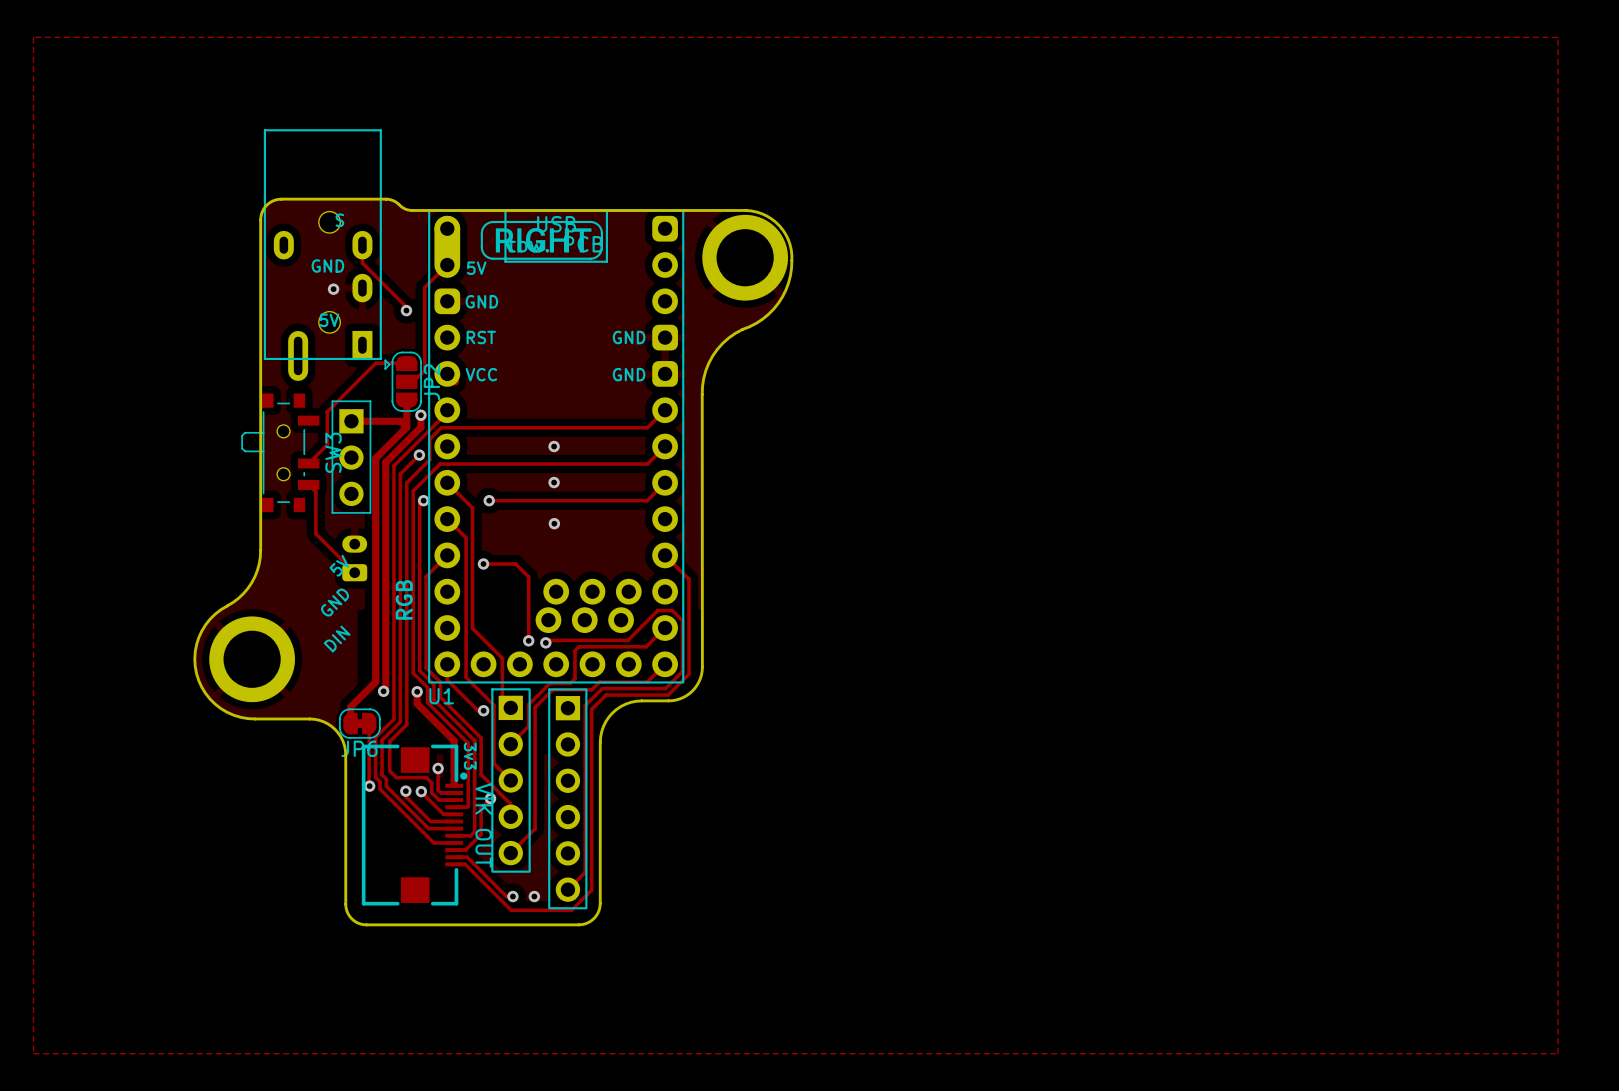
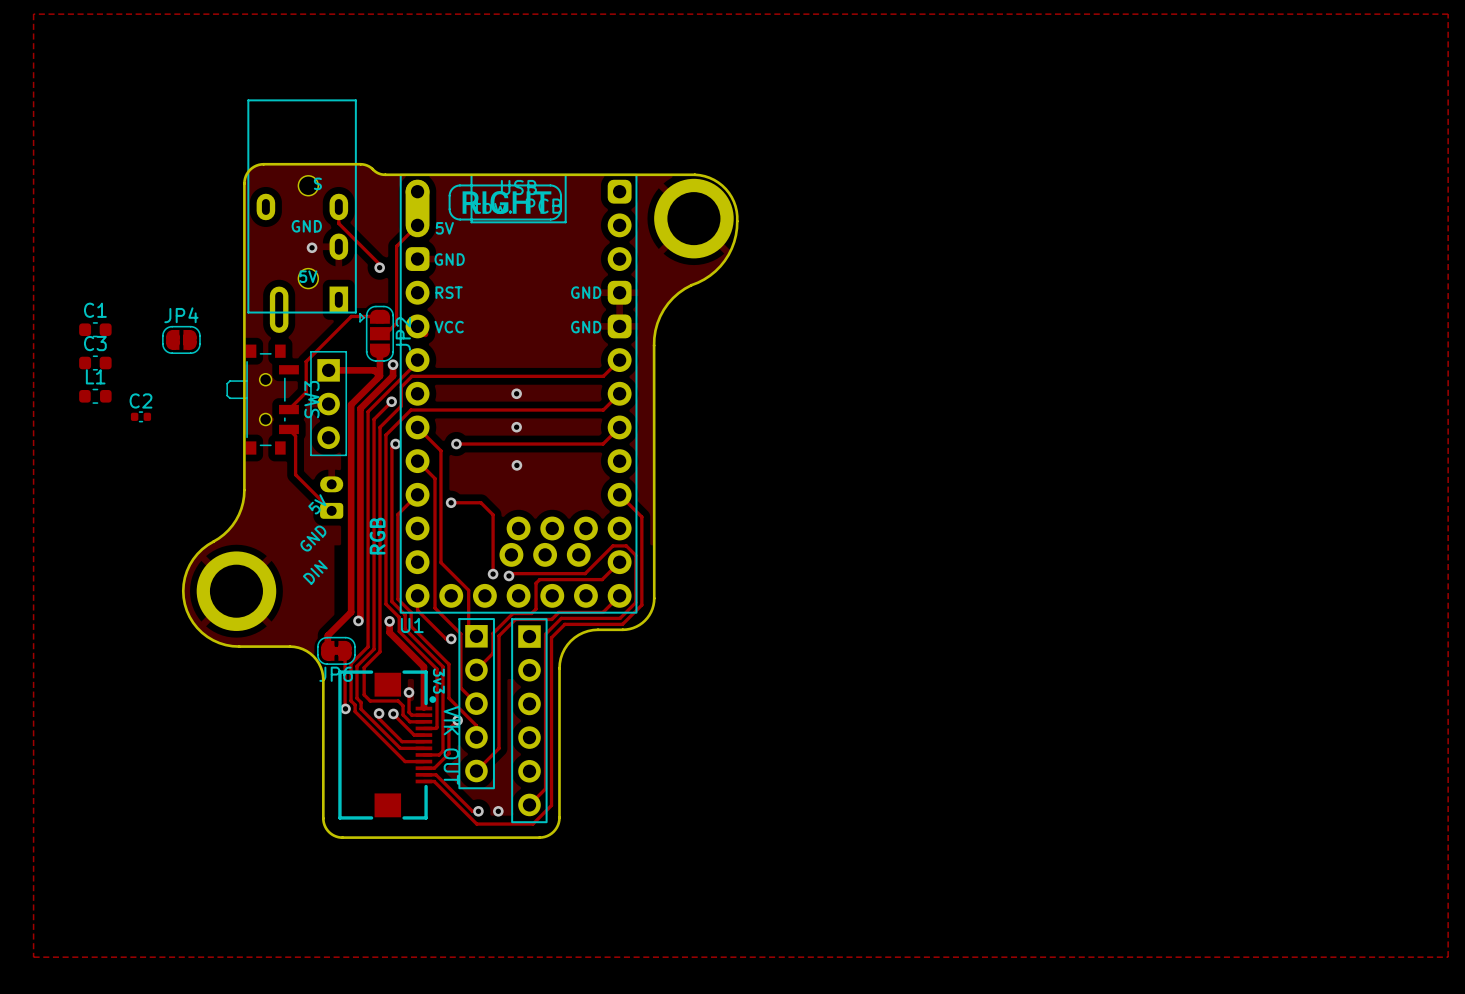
C1: none -> (95, 329)
JP4: none -> (181, 339)
C3: none -> (95, 363)
L1: none -> (95, 396)
C2: none -> (140, 416)

